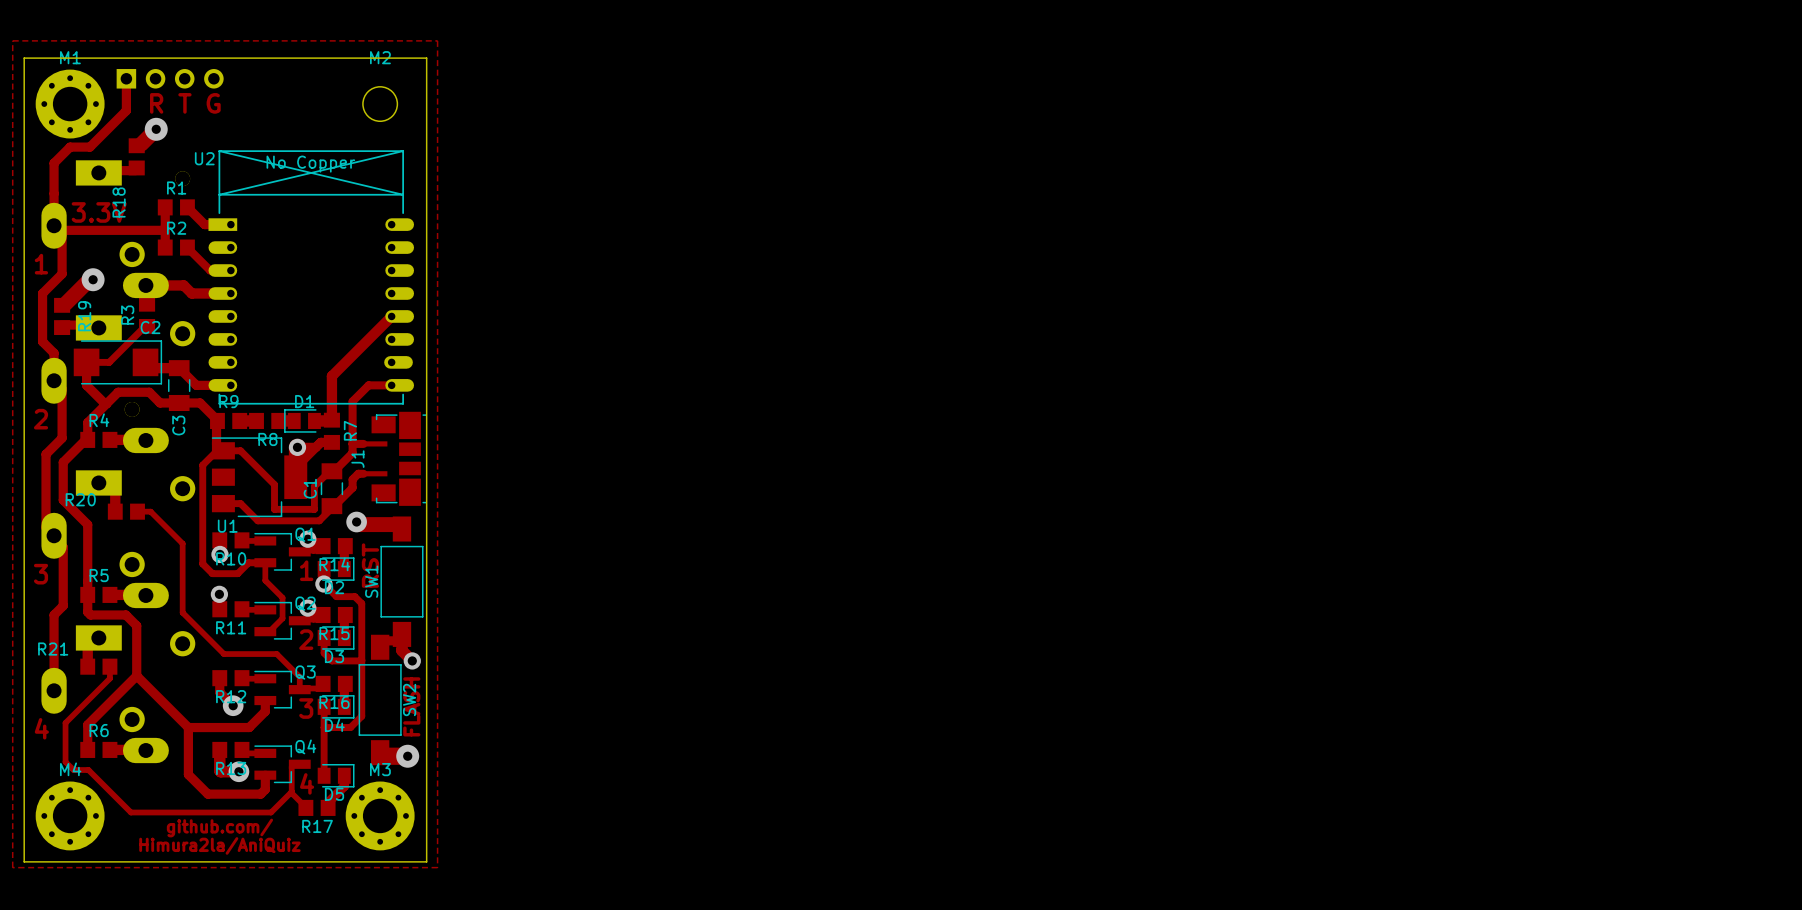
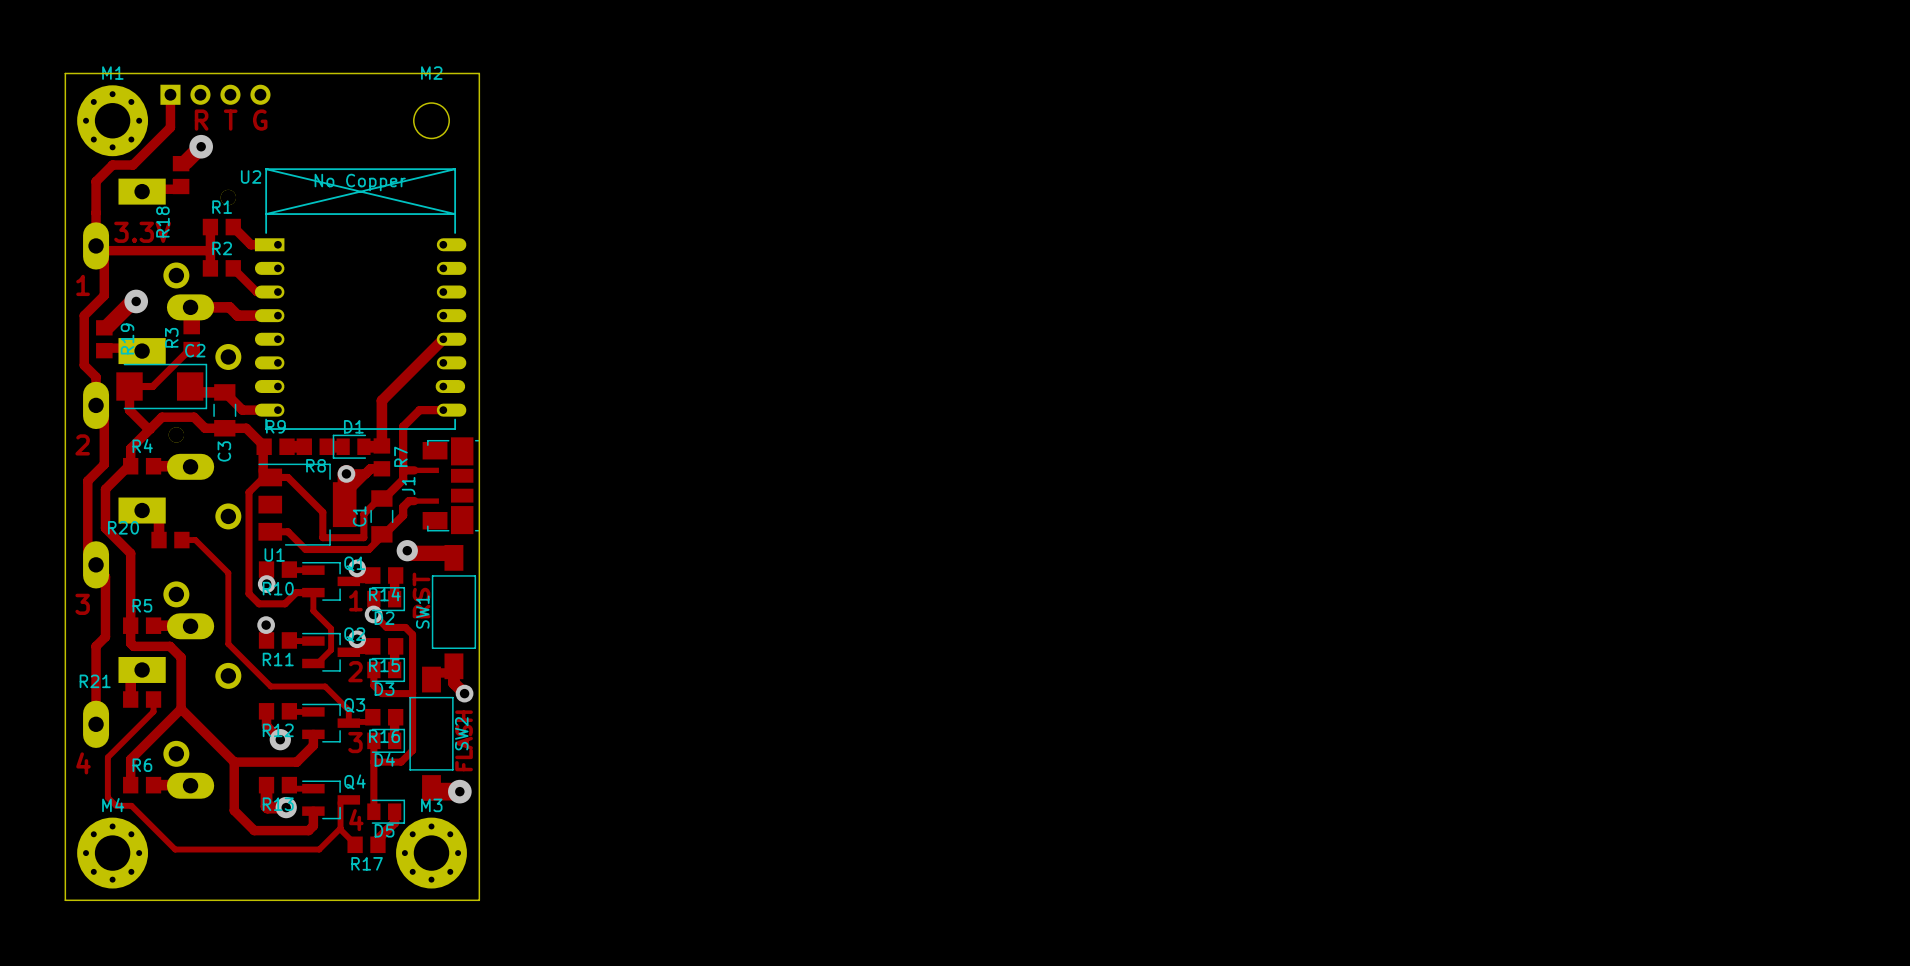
zone outline: (12, 40) (437, 40) (437, 867) (12, 867) (12, 40) -> none
text: github.com/ (219, 828) -> none
text: Himura2la/AniQuiz (219, 845) -> none

